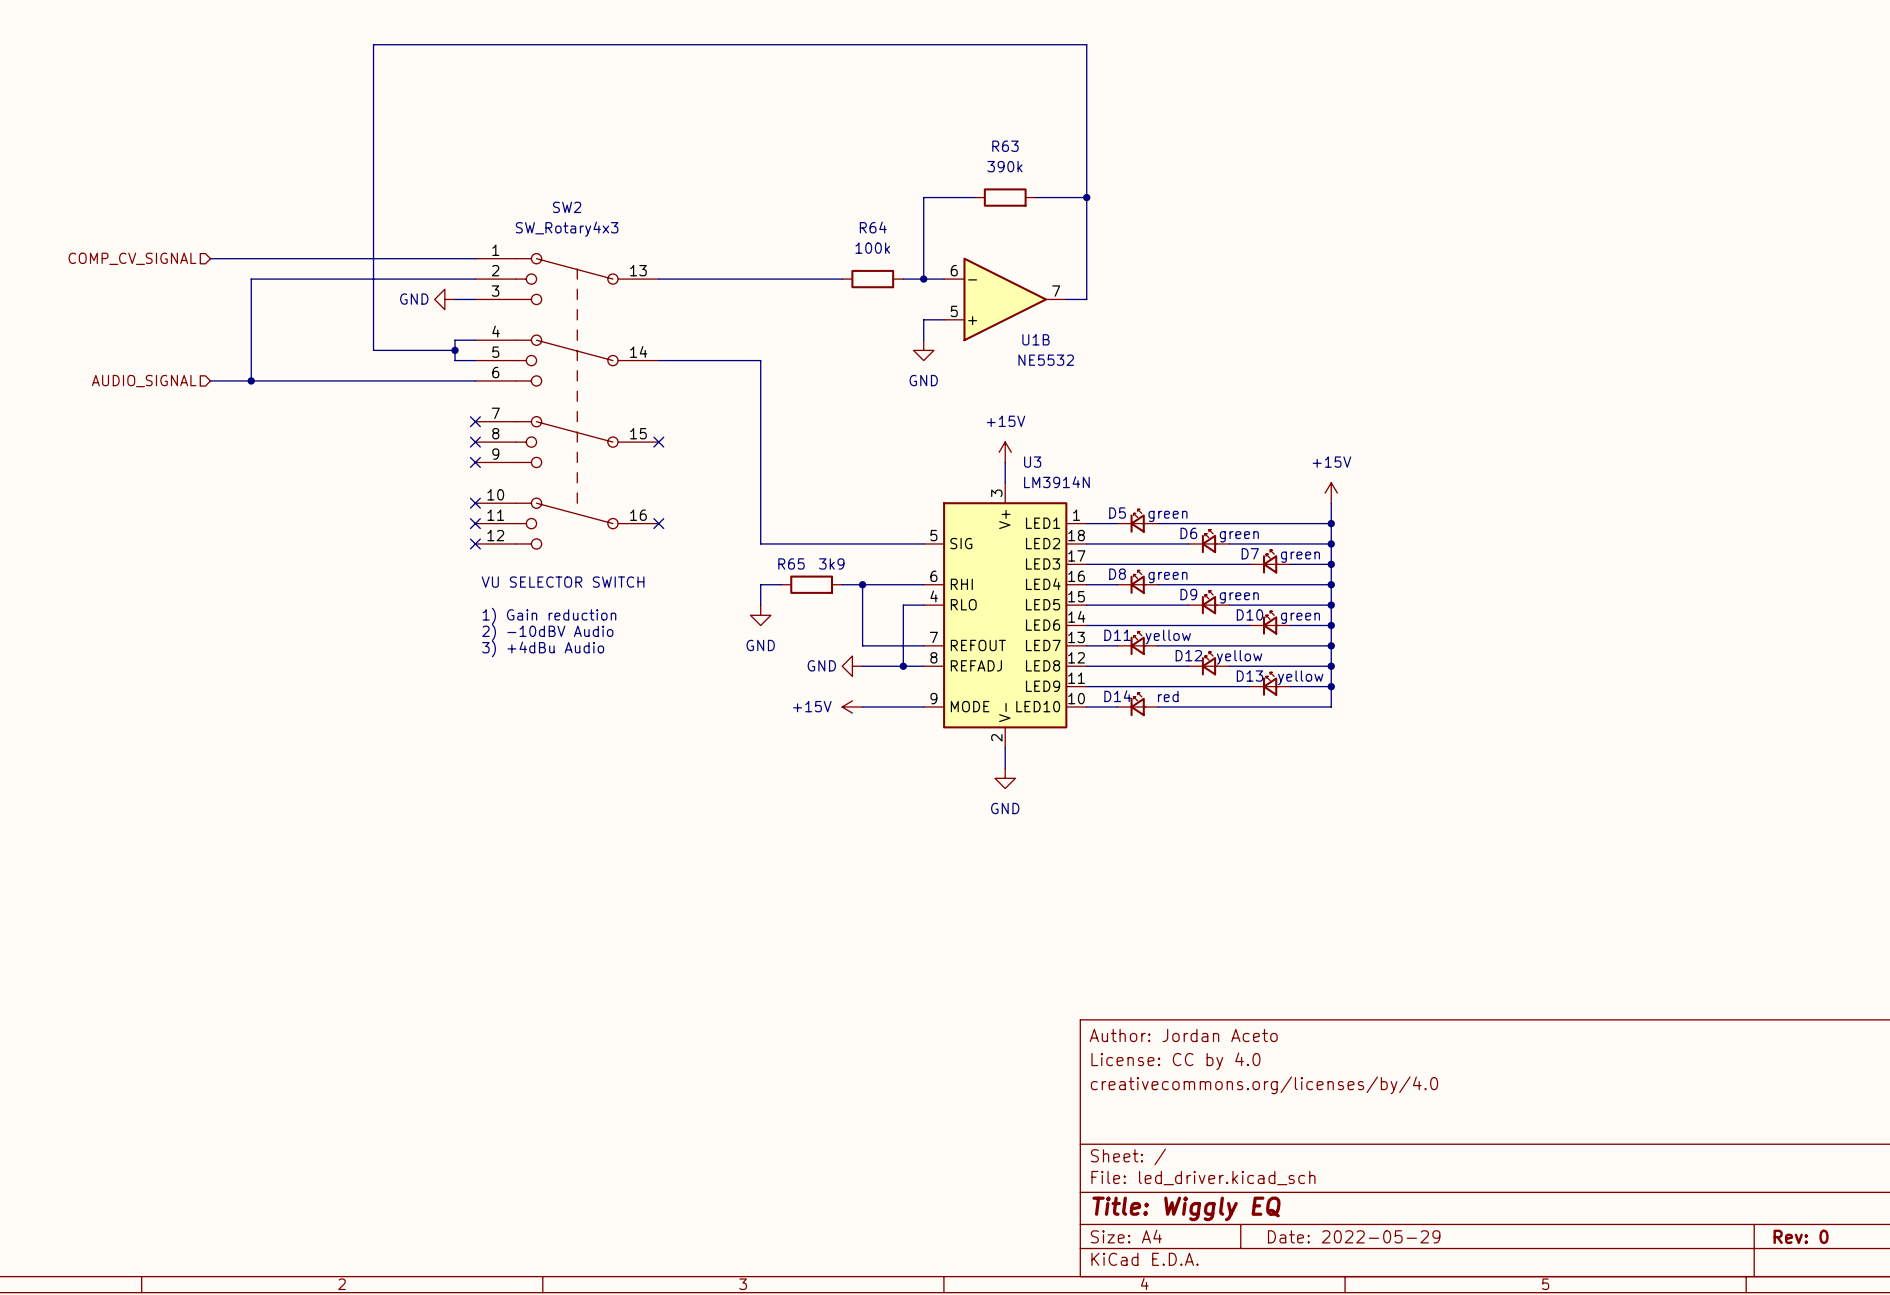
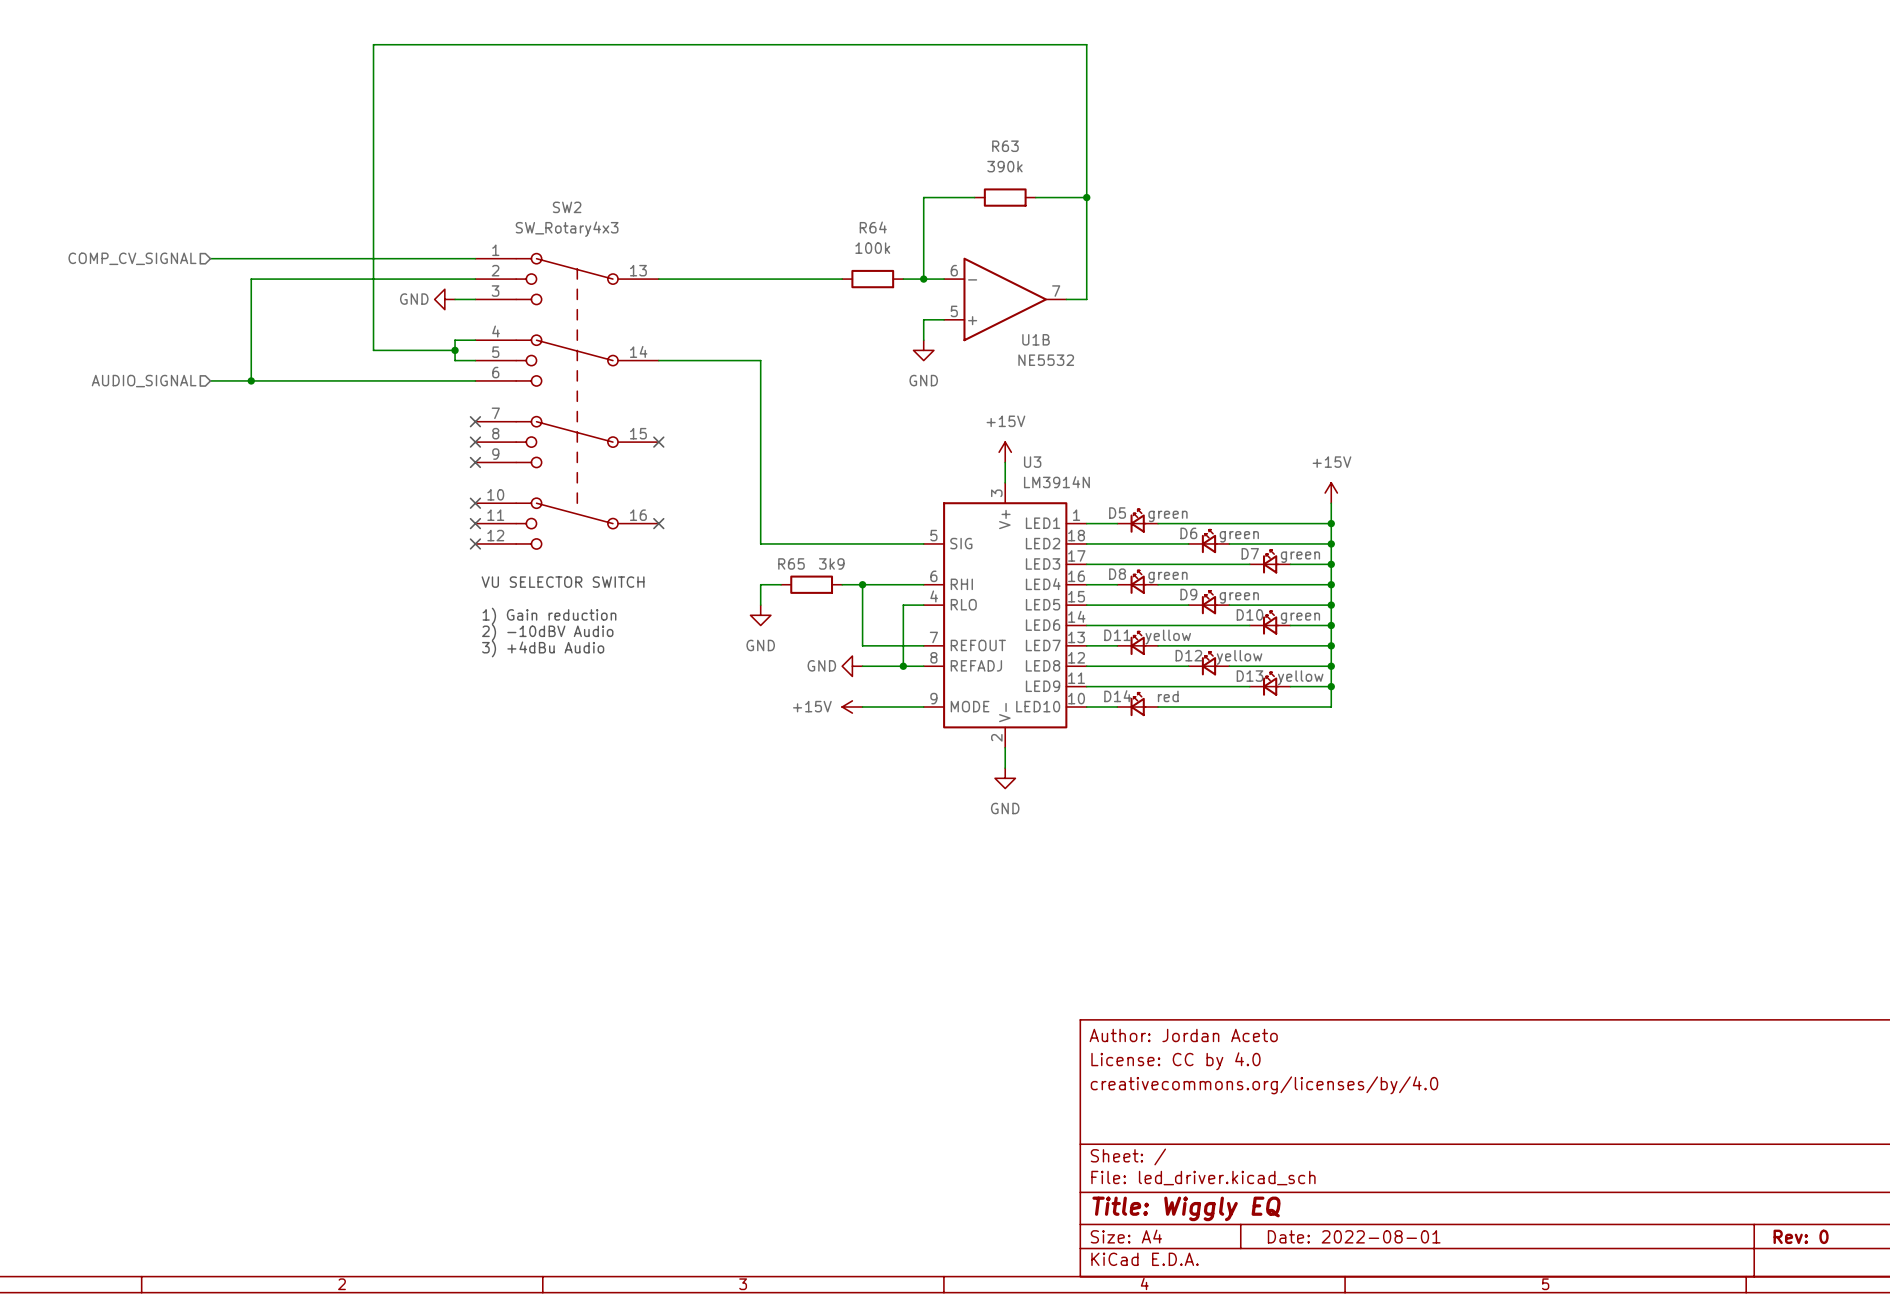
title block: Date: 2022-05-29 (1354, 1236) -> Date: 2022-08-01 (1354, 1236)

